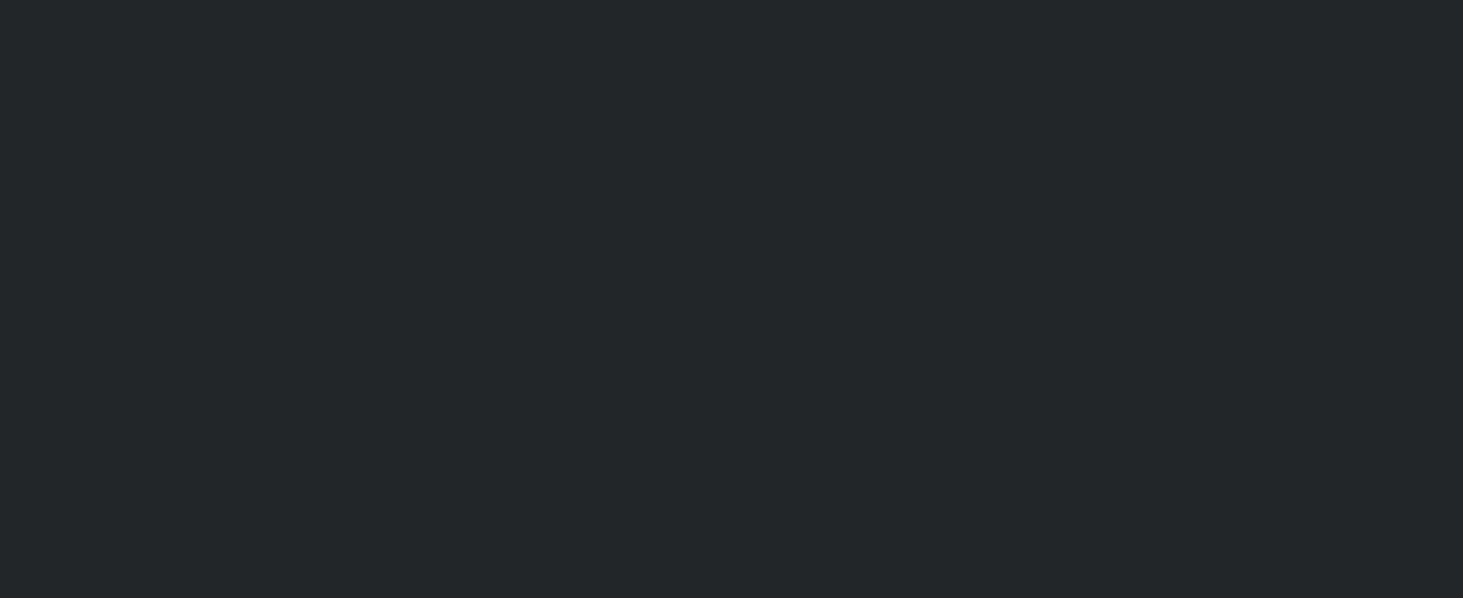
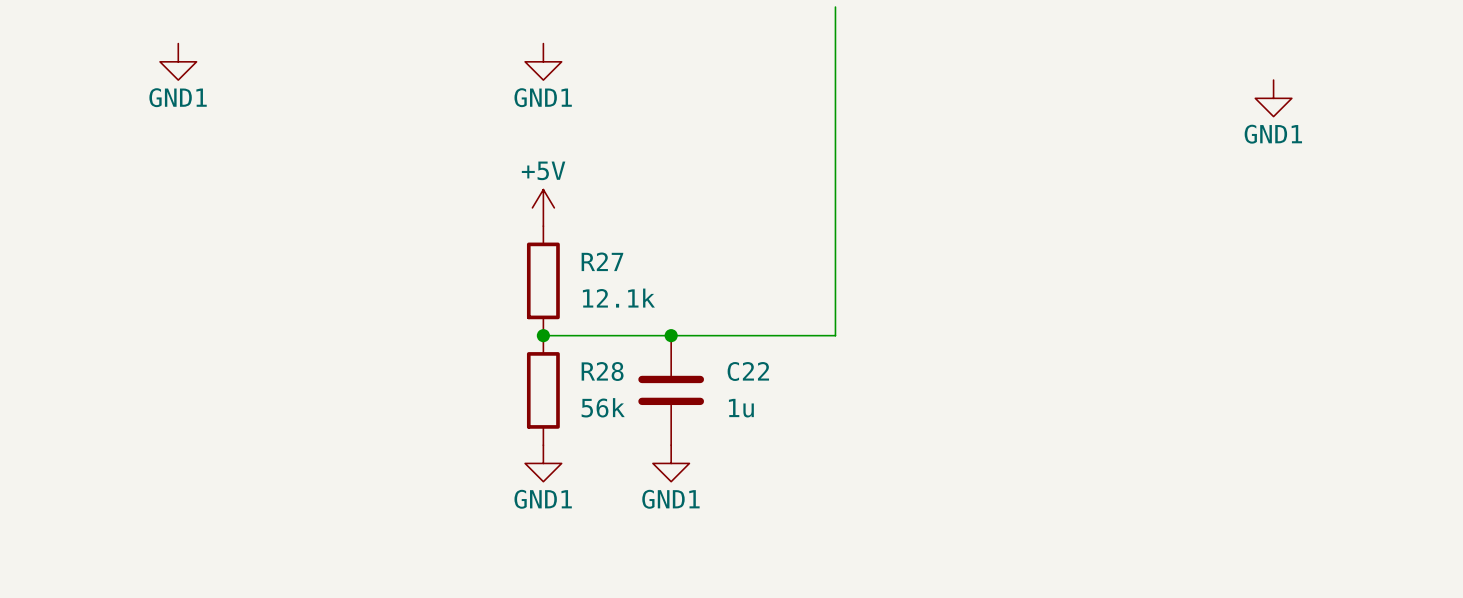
wire: none -> (835, 7) (835, 335) (543, 335)
power symbol: none -> GND1 (178, 61)
power symbol: none -> GND1 (543, 61)
power symbol: none -> GND1 (1273, 98)
power symbol: none -> +5V (543, 207)
R27: none -> 12.1k (543, 280)
junction: none -> (543, 335)
junction: none -> (671, 335)
R28: none -> 56k (543, 390)
C22: none -> 1u (671, 390)
power symbol: none -> GND1 (543, 463)
power symbol: none -> GND1 (671, 463)

